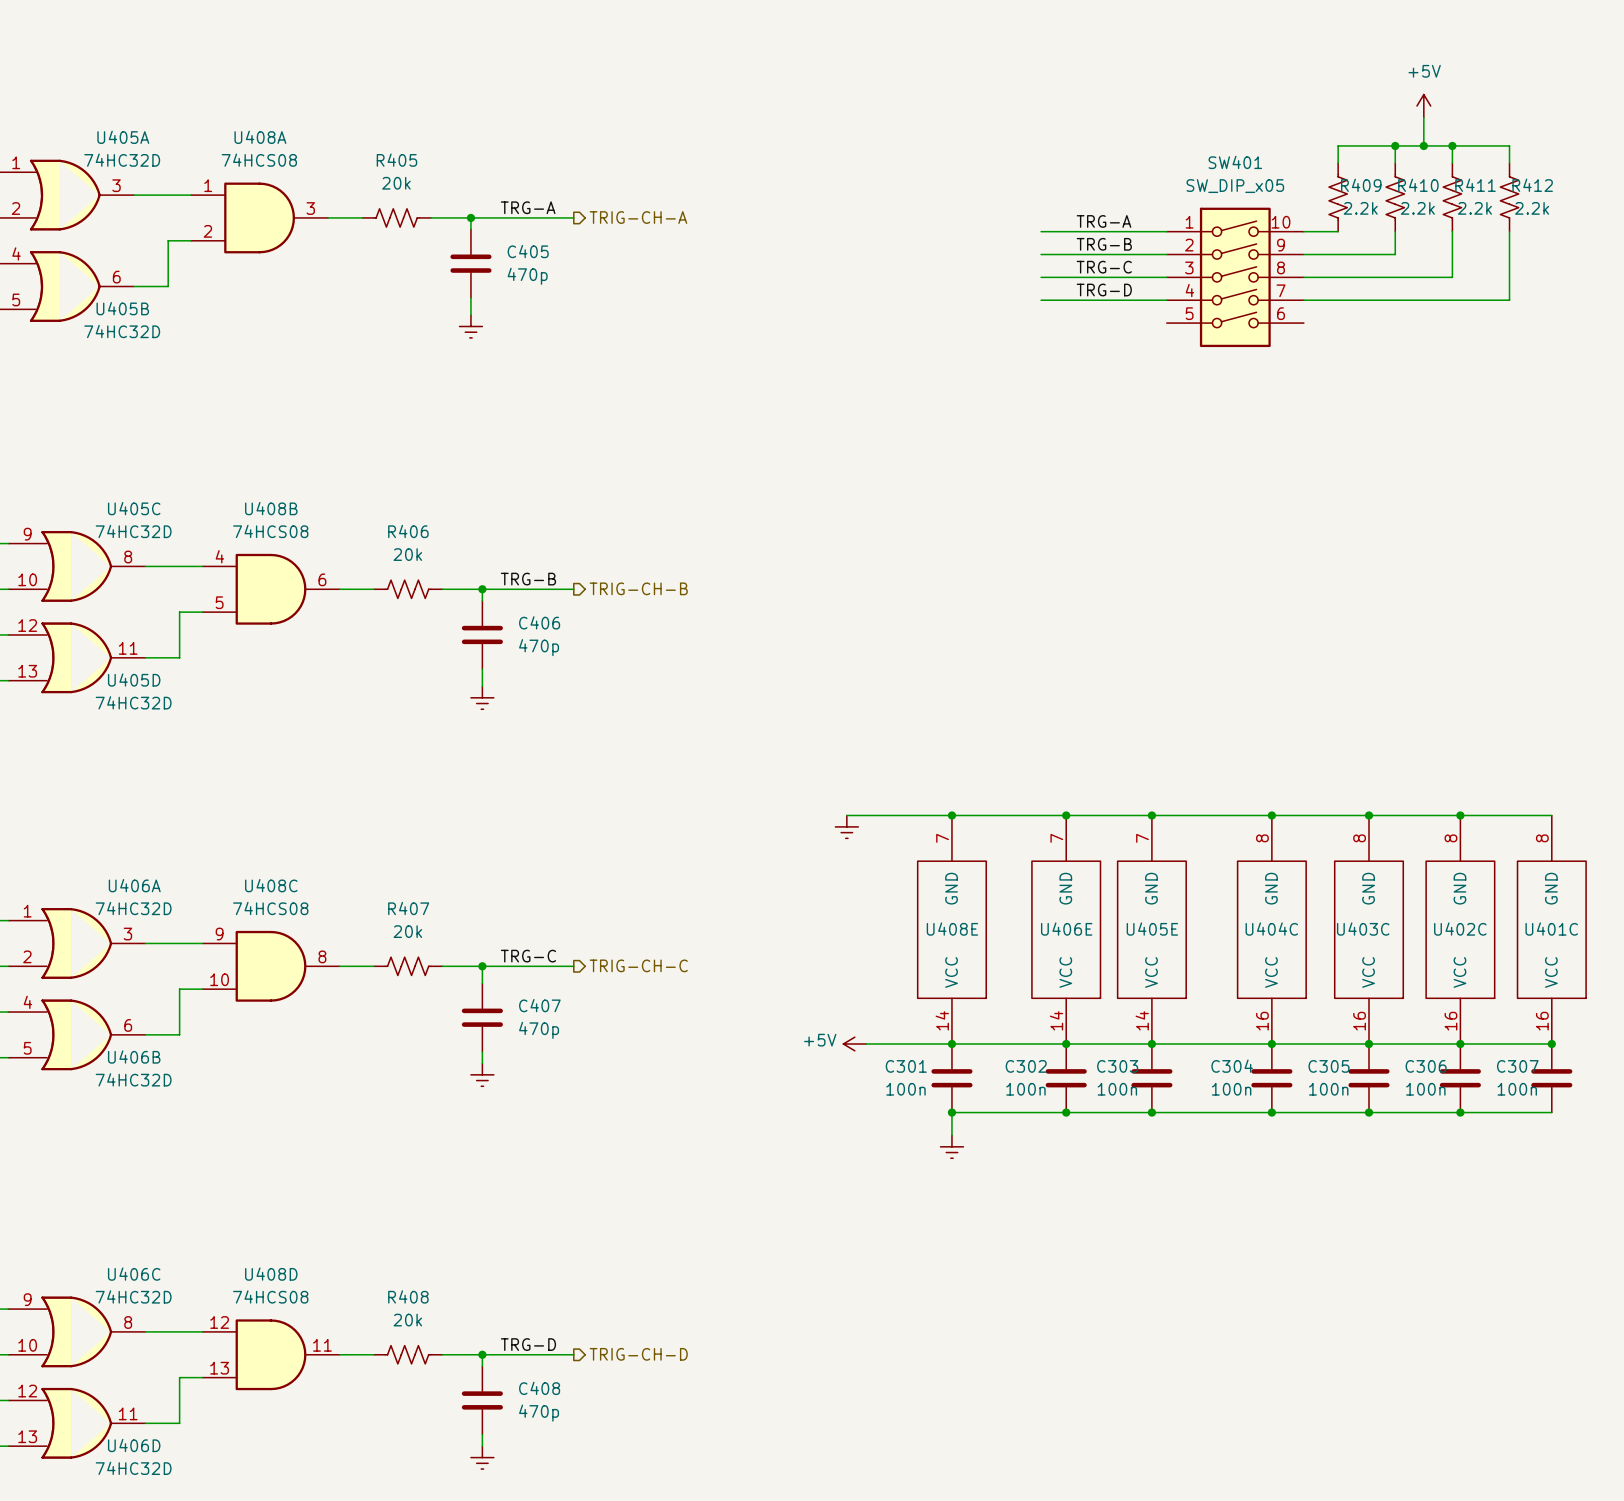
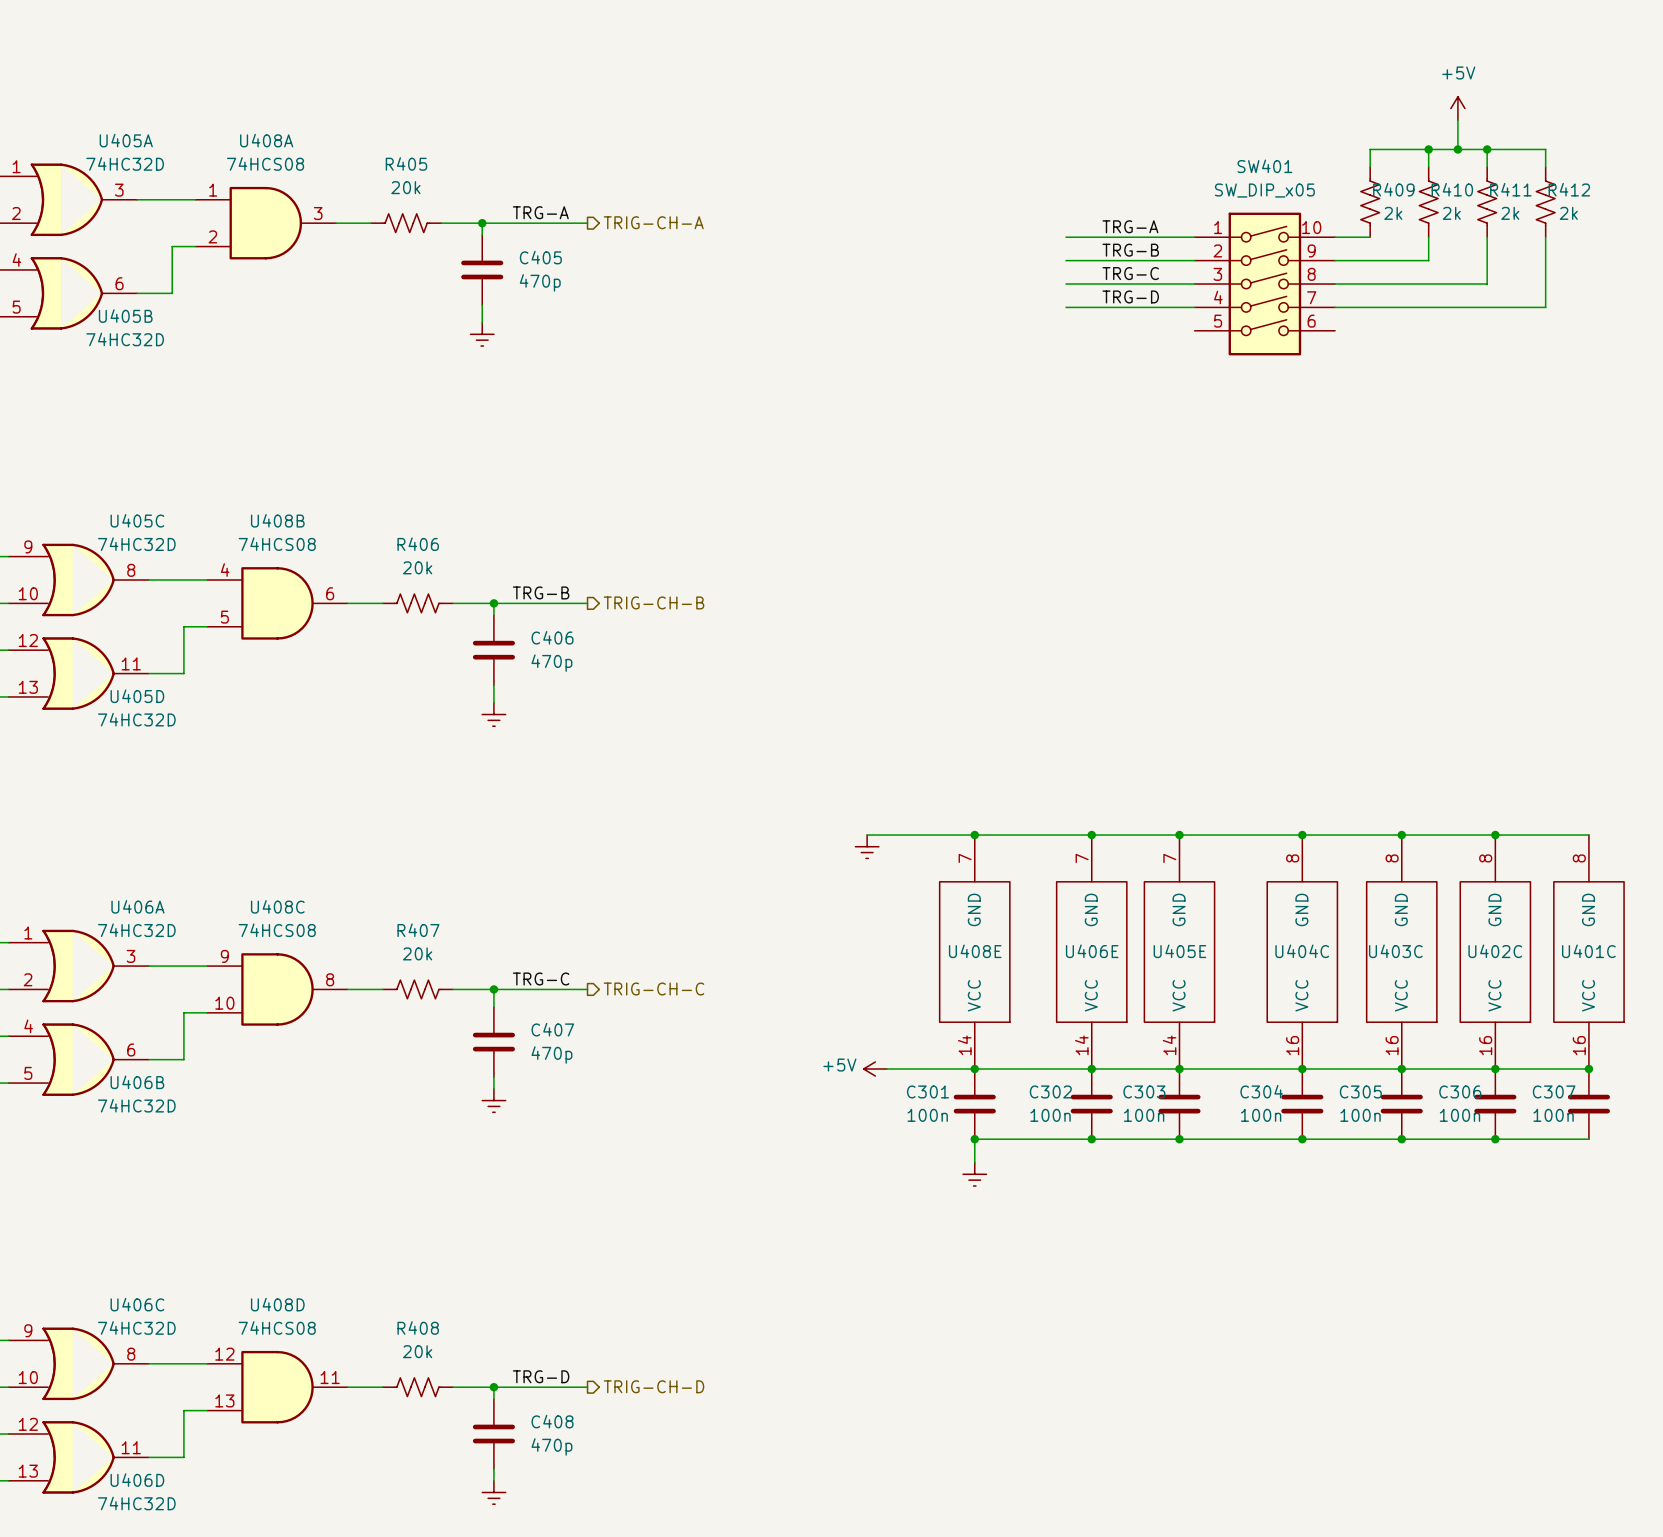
R409 value: 2.2k (1360, 208) -> 2k (1393, 213)
R410 value: 2.2k (1417, 208) -> 2k (1451, 213)
R411 value: 2.2k (1474, 208) -> 2k (1510, 213)
R412 value: 2.2k (1532, 208) -> 2k (1568, 213)

